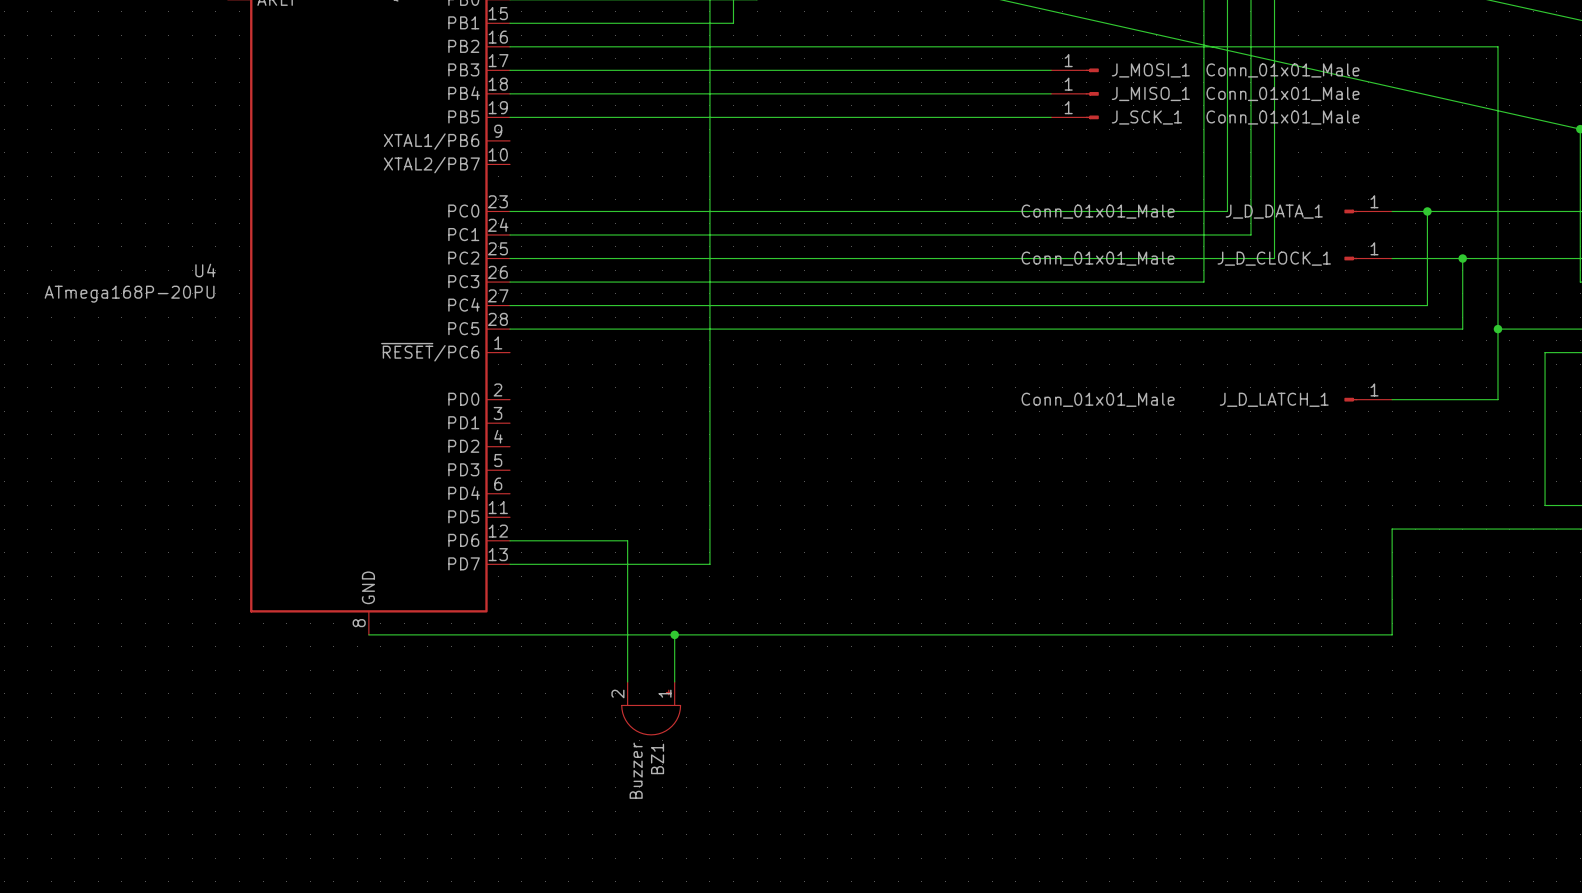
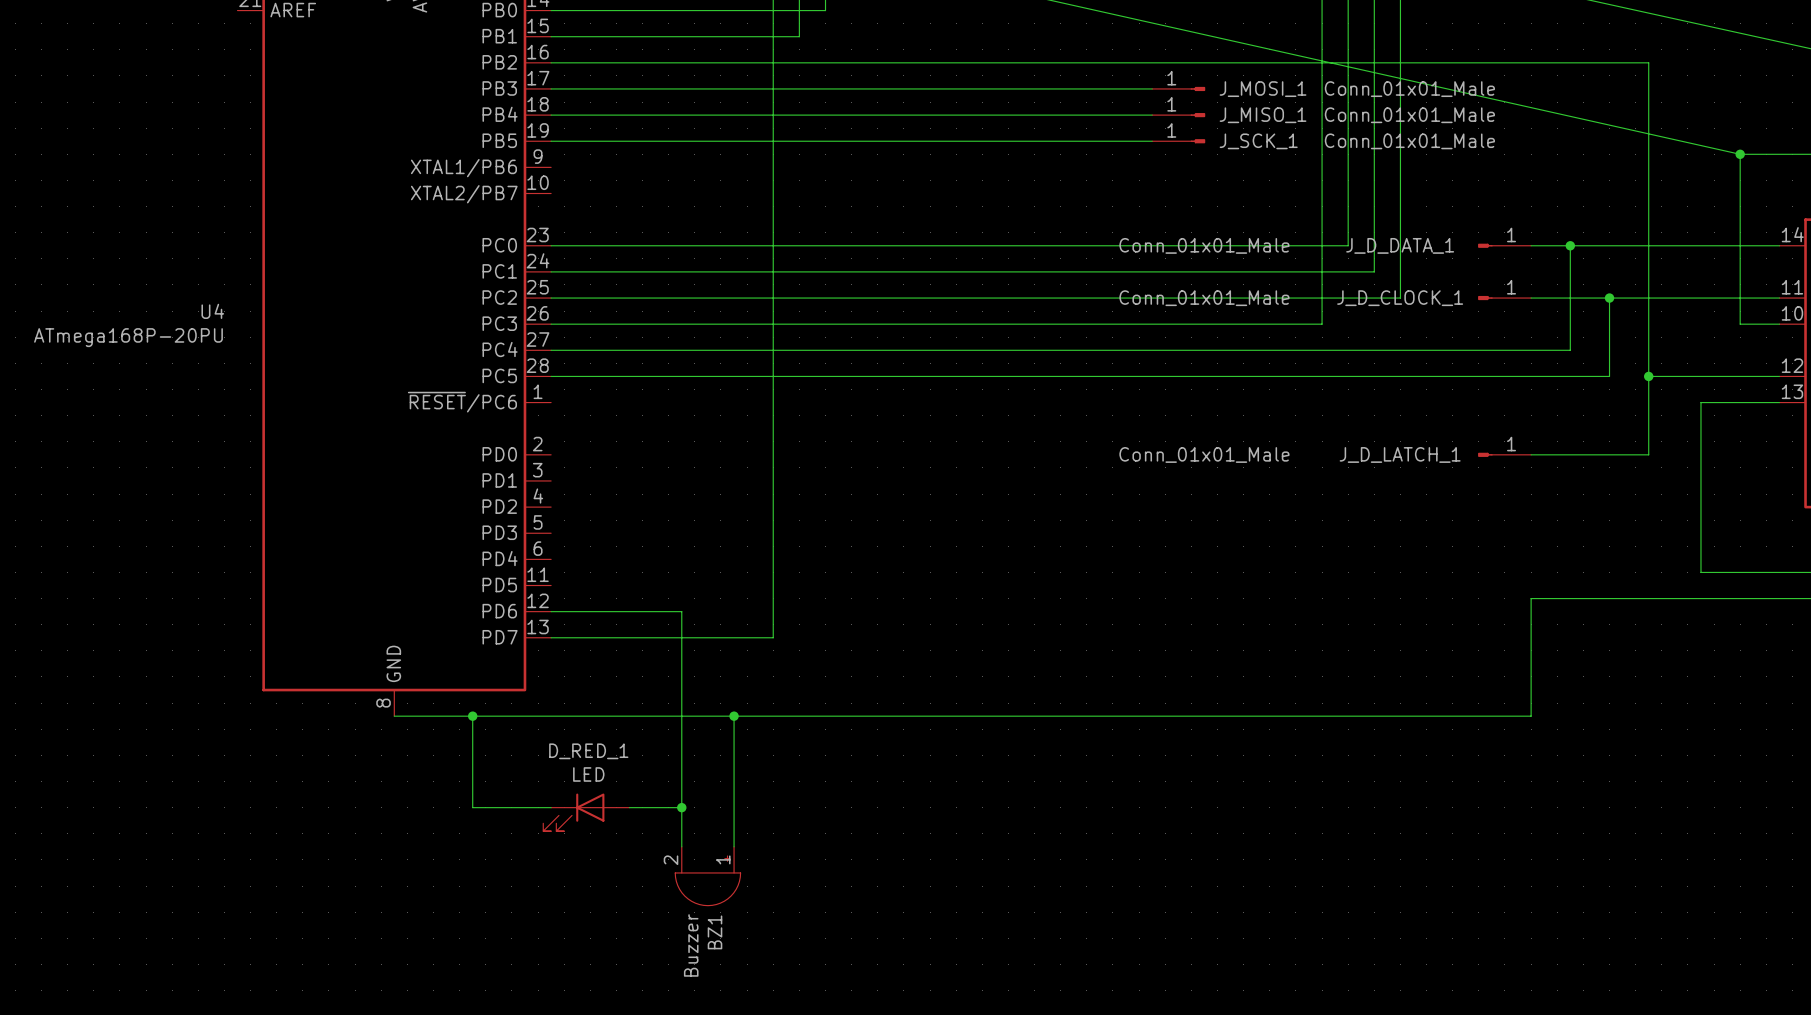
wire: none -> (472, 716) (472, 807) (551, 807)
junction: none -> (472, 716)
wire: none -> (681, 768) (681, 846)
wire: none -> (734, 768) (734, 846)
BZ1 position: (651, 708) -> (707, 876)
wire: none -> (629, 807) (681, 807)
junction: none -> (681, 807)
D_RED_1: none -> LED (586, 812)

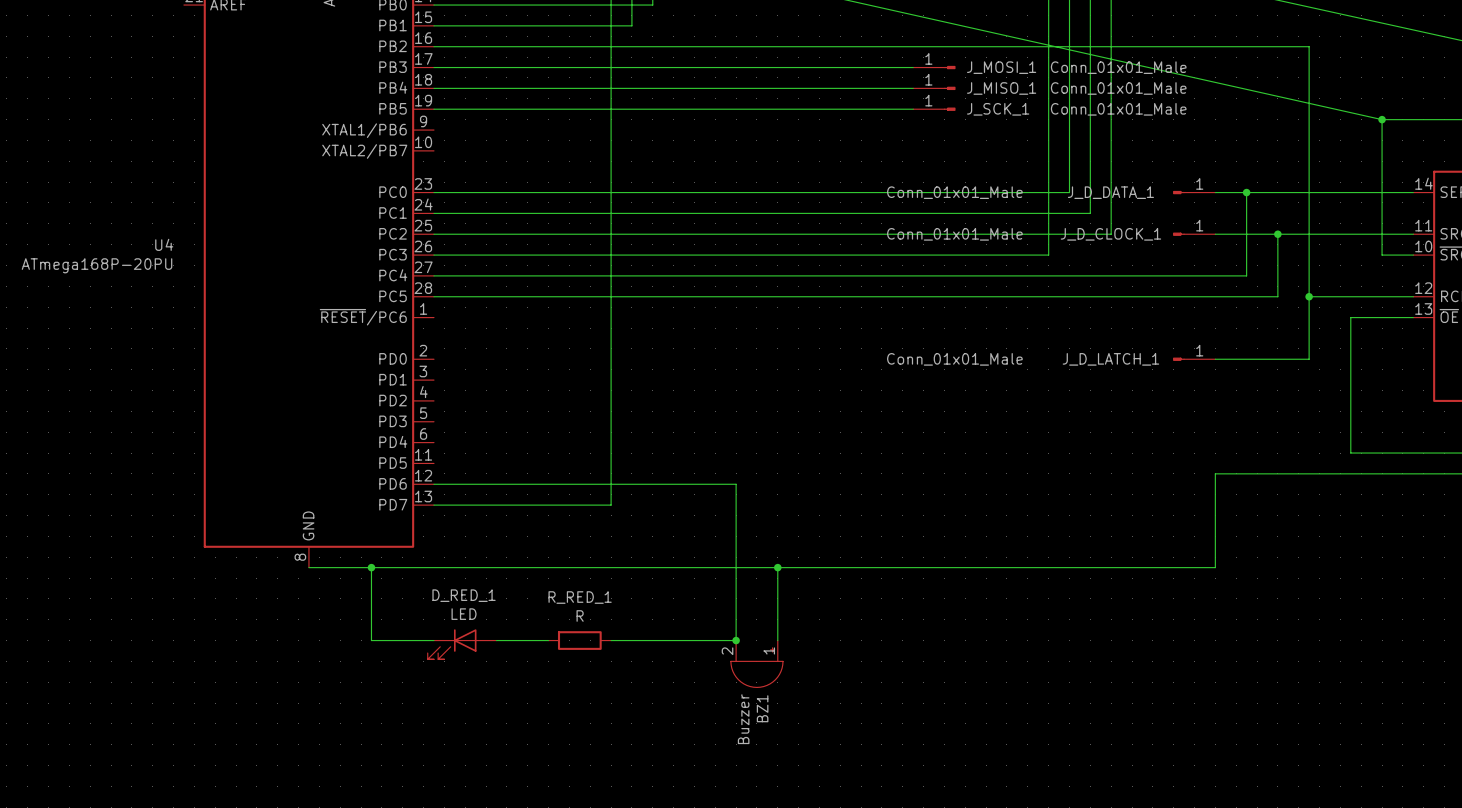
wire: (681, 611) (681, 846) -> (538, 484) (736, 484) (736, 640) (611, 640)
wire: (734, 716) (734, 846) -> none
junction: (734, 716) -> none
wire: none -> (777, 567) (777, 640)
junction: none -> (777, 567)
wire: none -> (538, 640) (548, 640)
junction: (681, 807) -> none
R_RED_1: none -> R (579, 640)
junction: none -> (736, 640)
BZ1 position: (707, 876) -> (756, 663)

